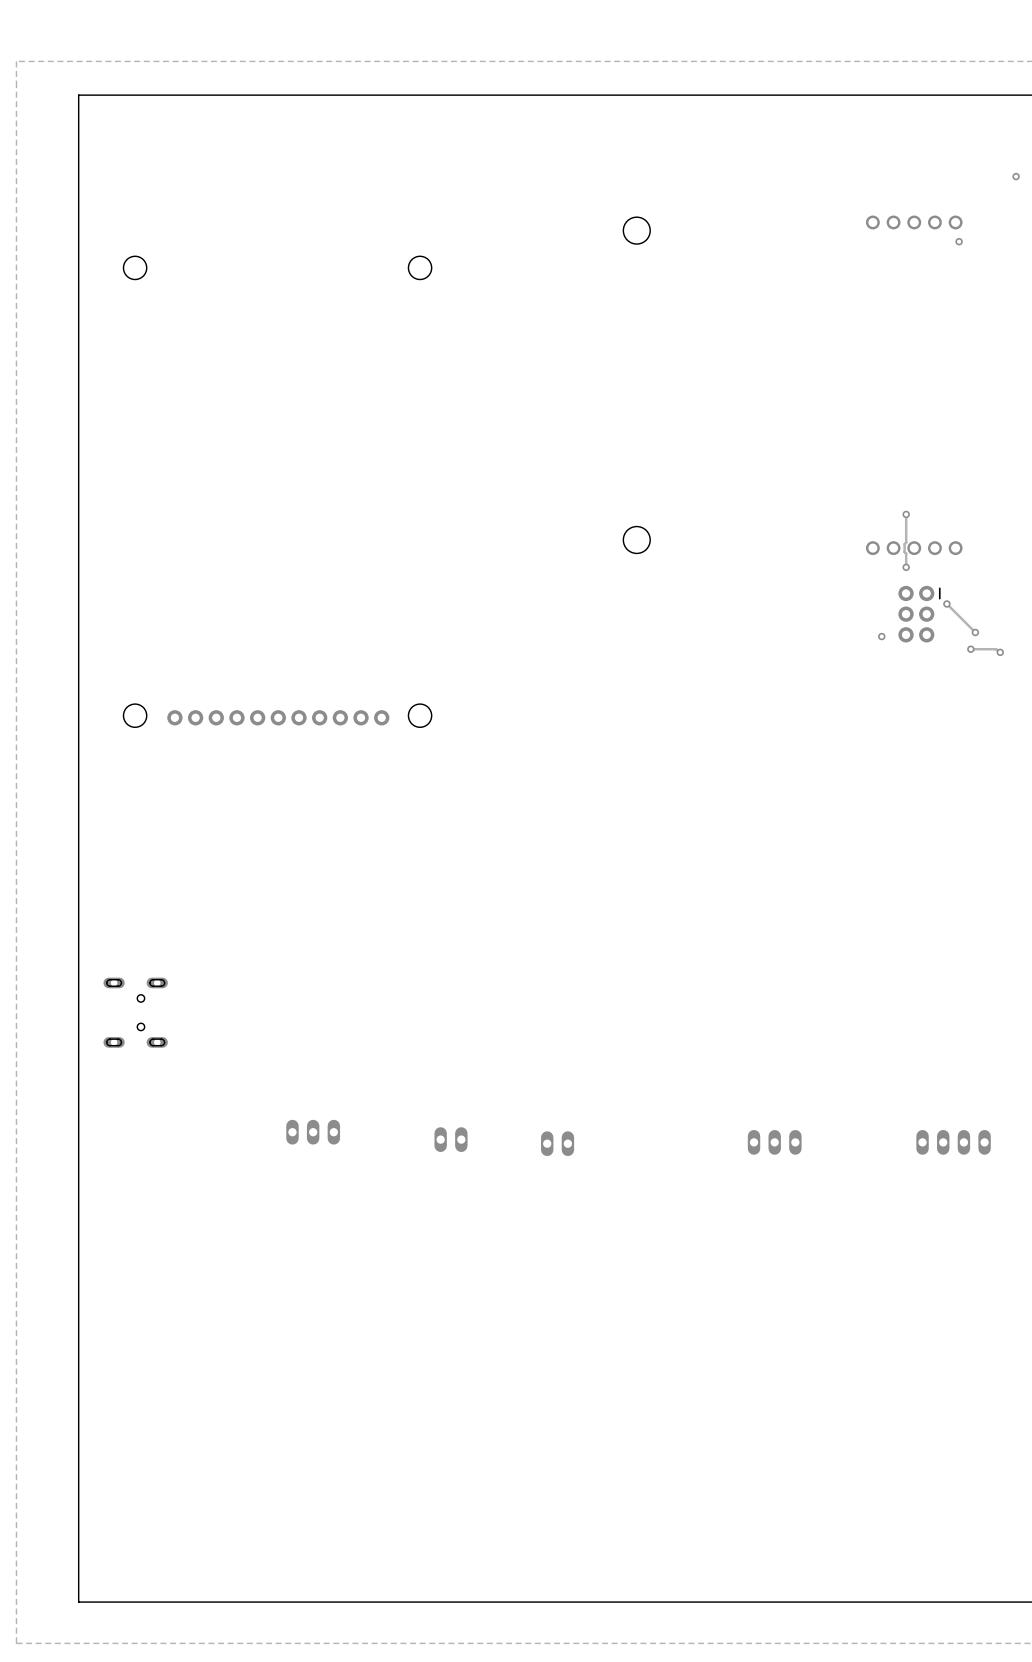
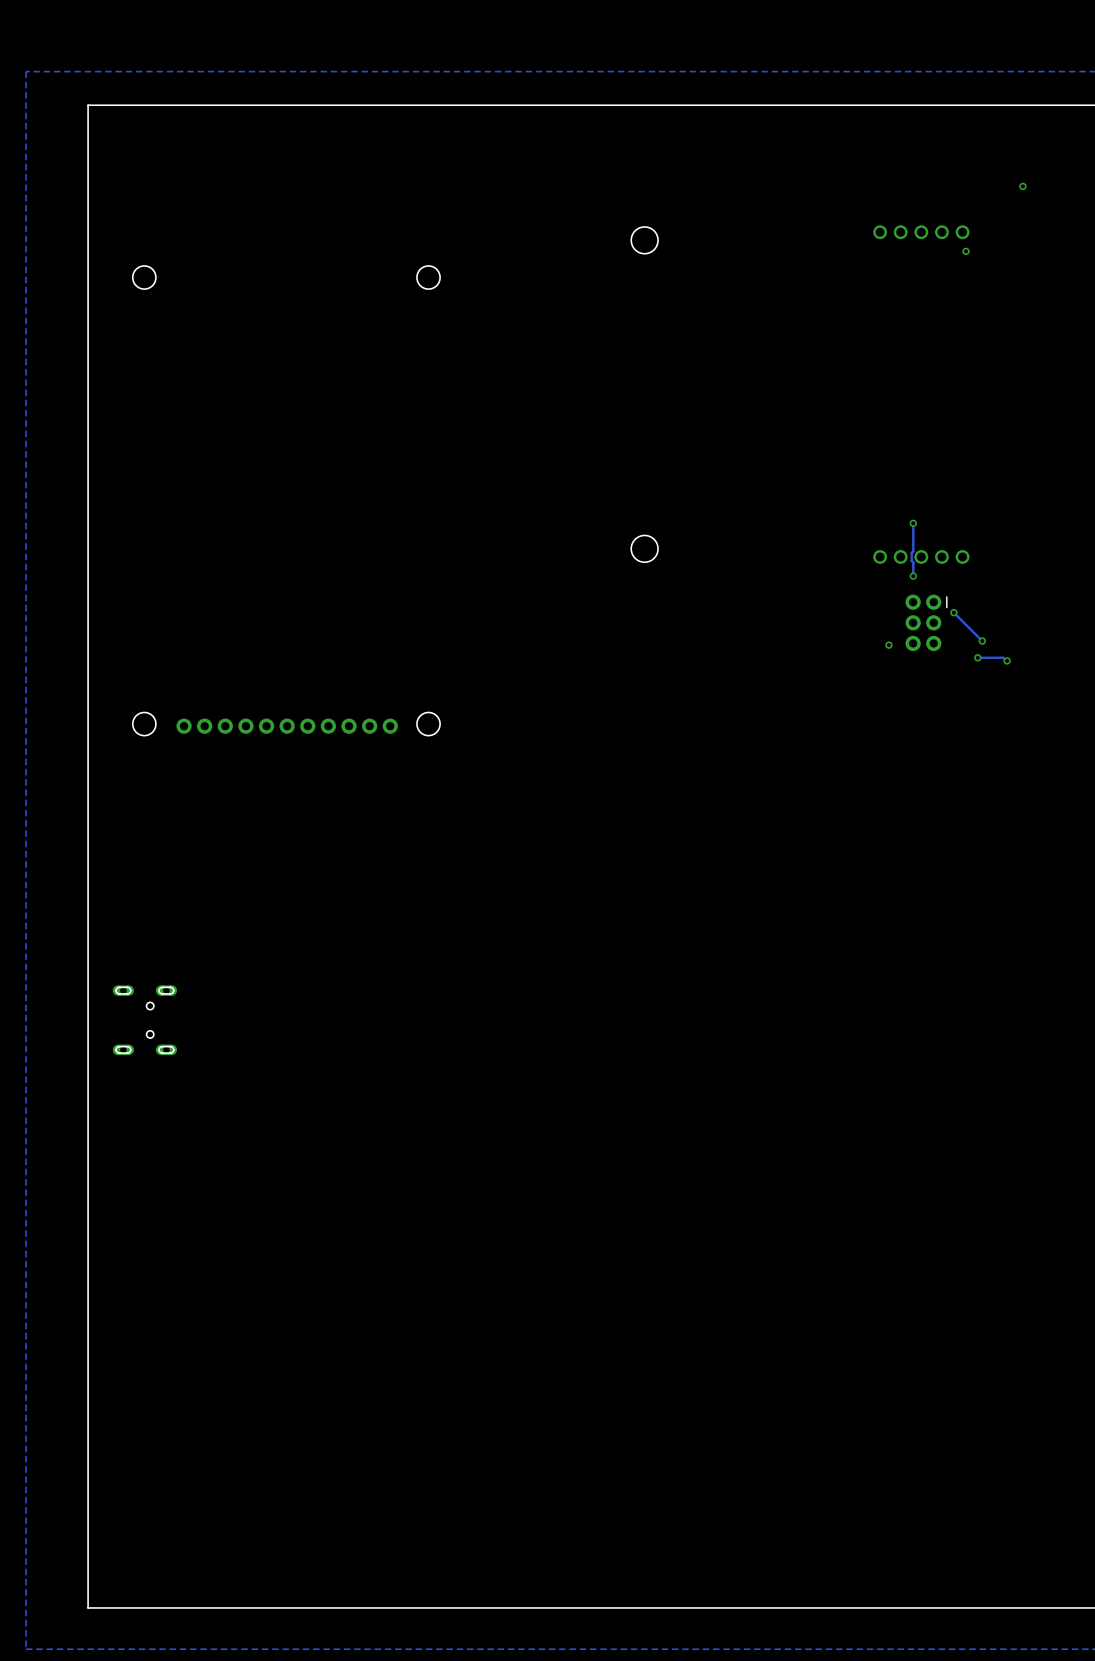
part: (313, 1132) -> none
part: (450, 1139) -> none
part: (774, 1142) -> none
part: (953, 1142) -> none
part: (557, 1143) -> none

